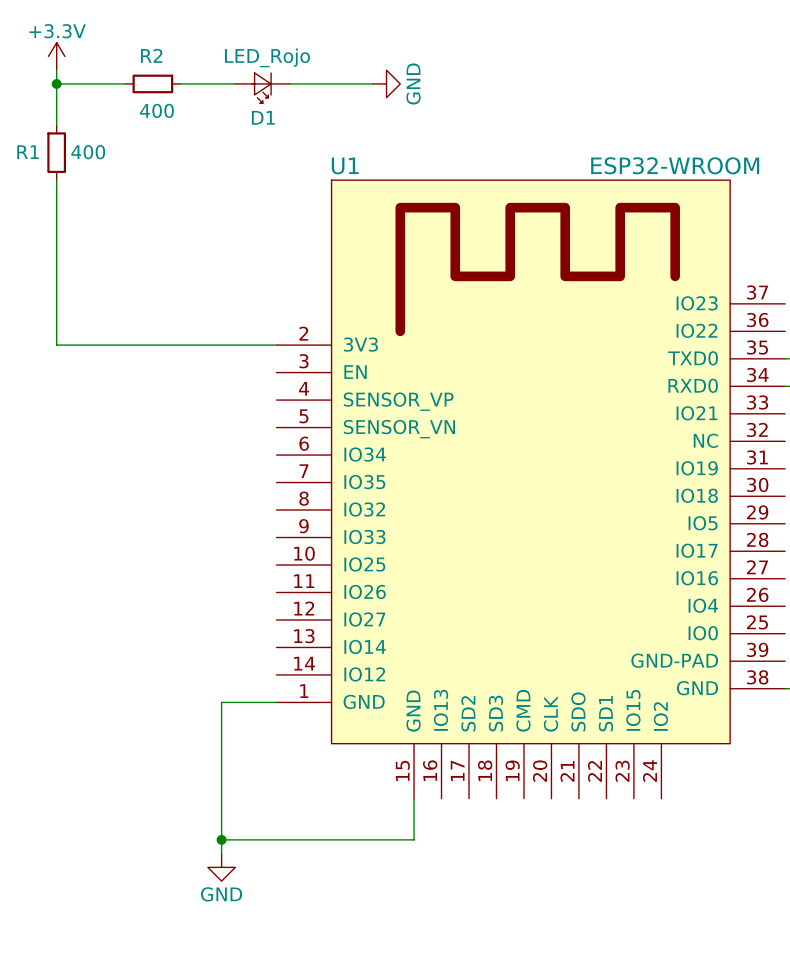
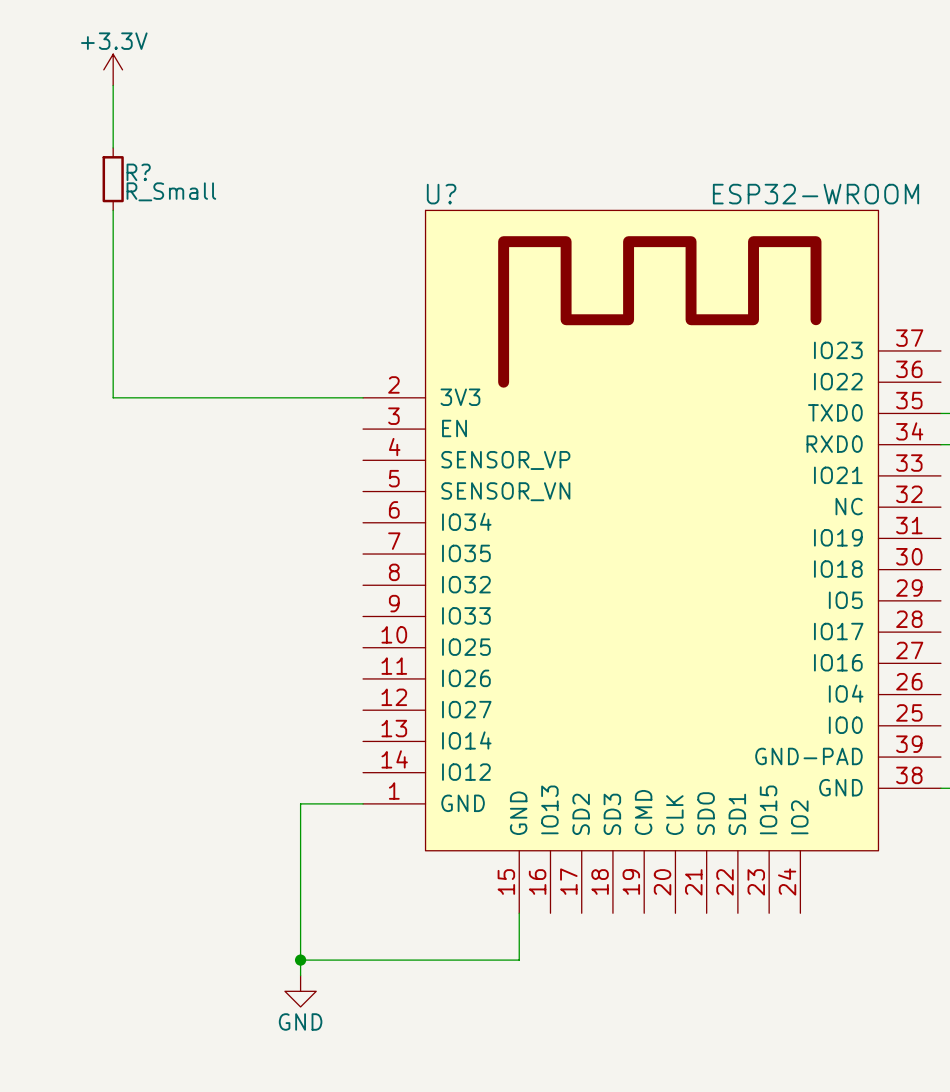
wire: (56, 83) (125, 83) -> none
junction: (56, 83) -> none
R2: 400 (152, 83) -> none
wire: (180, 83) (235, 83) -> none
wire: (290, 83) (372, 83) -> none
power symbol: GND (386, 83) -> none
D1: LED_Rojo (262, 88) -> none
R1 name: R1 (28, 152) -> R? (138, 172)
R1 value: 400 (88, 152) -> R_Small (171, 191)
U1 name: U1 (345, 165) -> U? (441, 194)

